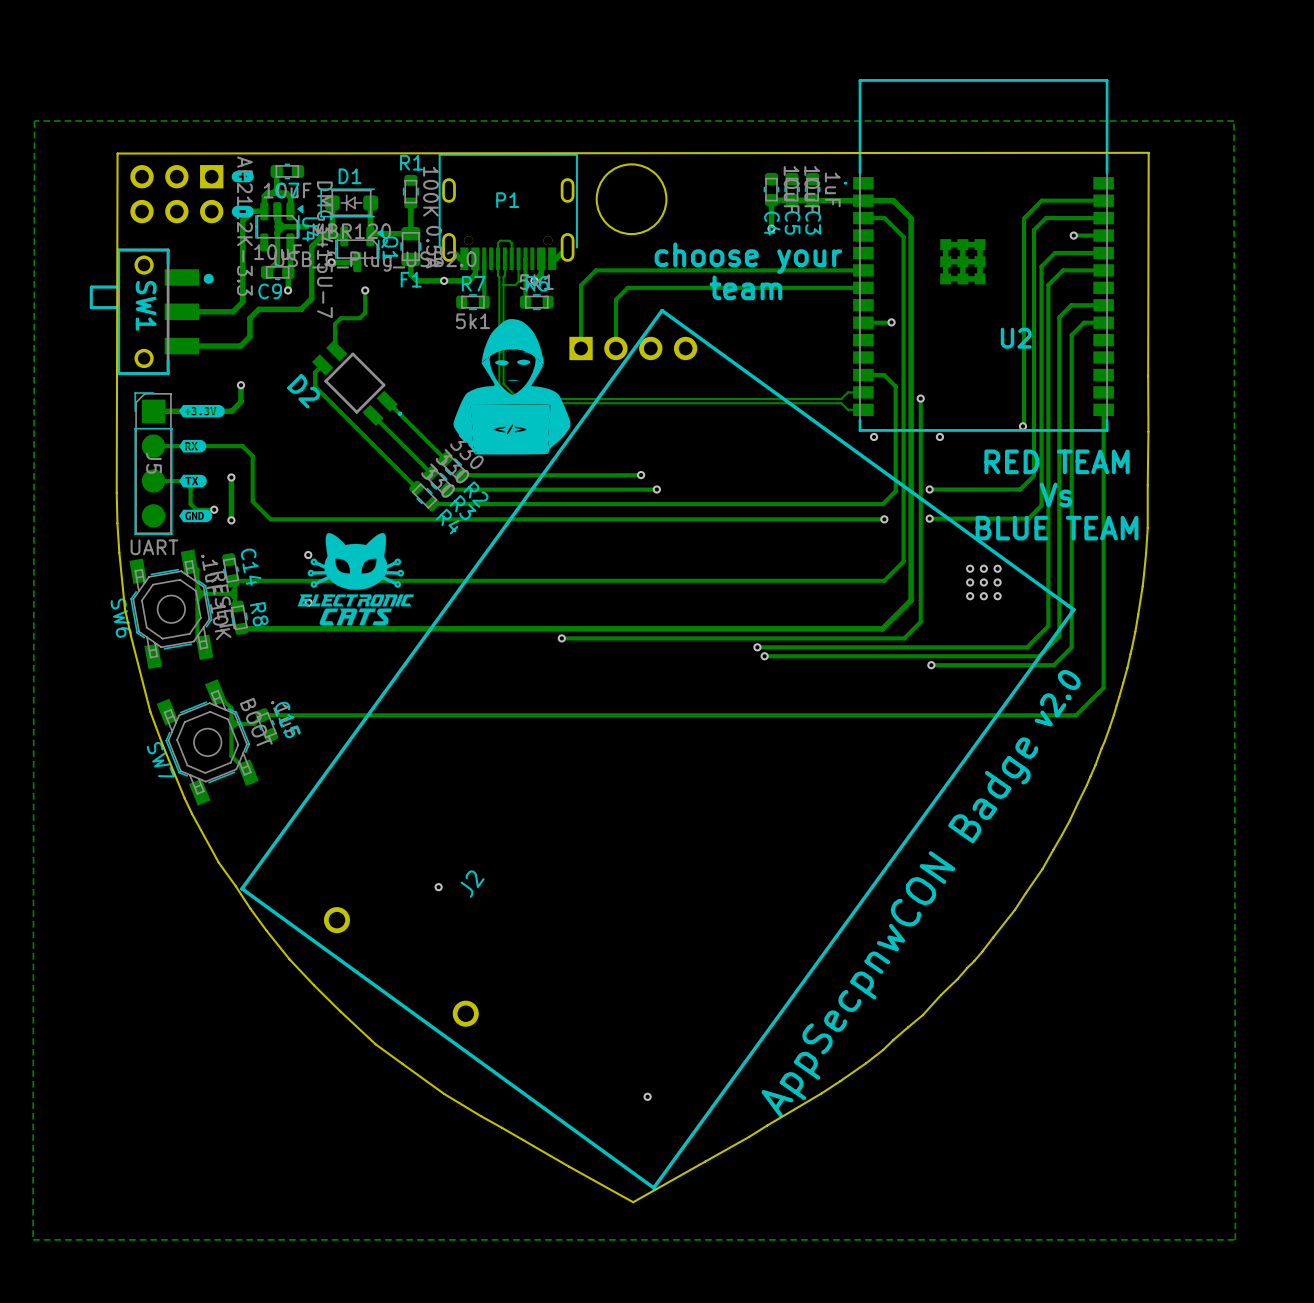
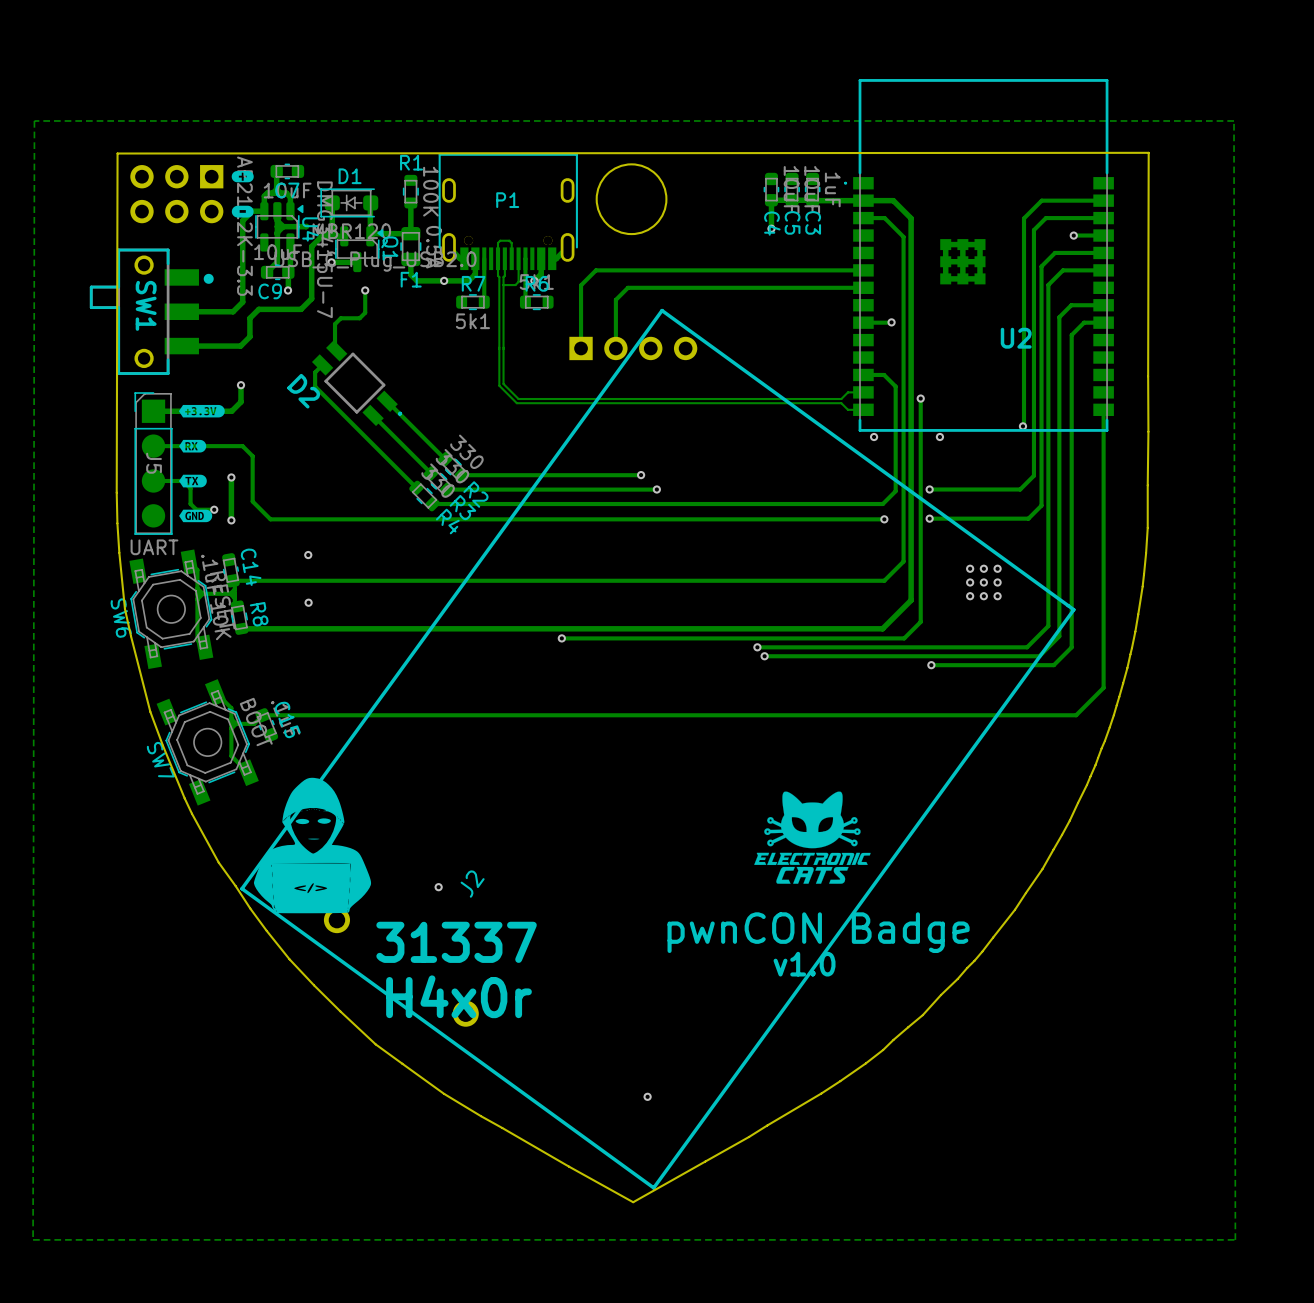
text: choose your (748, 258) -> none
text: team (745, 287) -> none
drawing: [453, 319, 571, 455] -> none
text: RED TEAM (1057, 461) -> none
text: Vs (1056, 494) -> none
text: BLUE TEAM (1057, 528) -> none
drawing: [297, 533, 414, 626] -> none
text: v2.0 (1057, 698) -> none
drawing: none -> [253, 777, 372, 914]
drawing: none -> [754, 791, 871, 884]
text: AppSecpnwCON Badge (899, 927) -> pwnCON Badge (818, 932)
text: none -> 31337 (456, 942)
text: none -> v1.0 (804, 964)
text: none -> H4x0r (459, 996)

